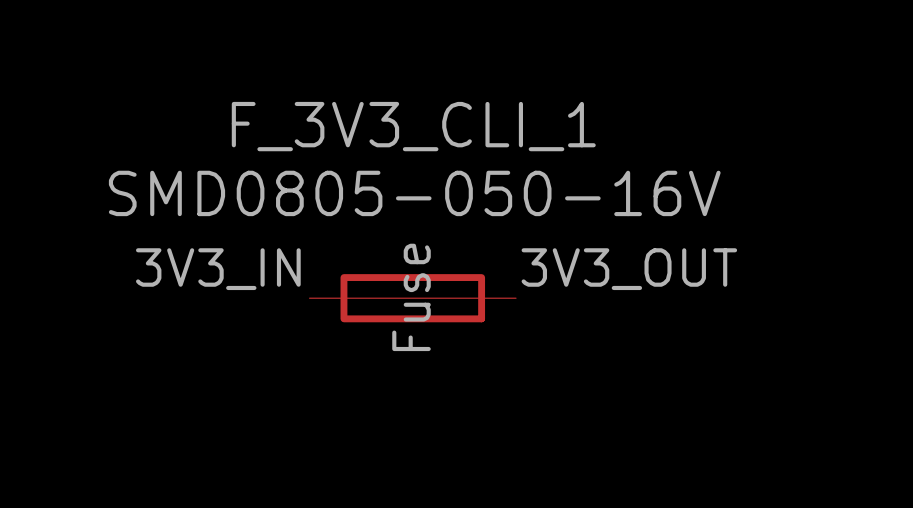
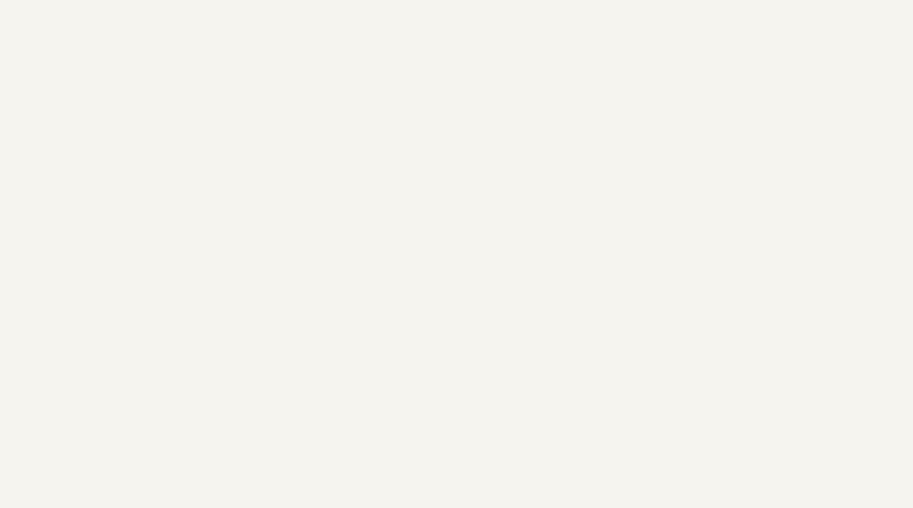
label: 3V3_IN (218, 269) -> none
label: 3V3_OUT (629, 269) -> none
F_3V3_CLI_1: SMD0805-050-16V (412, 298) -> none

